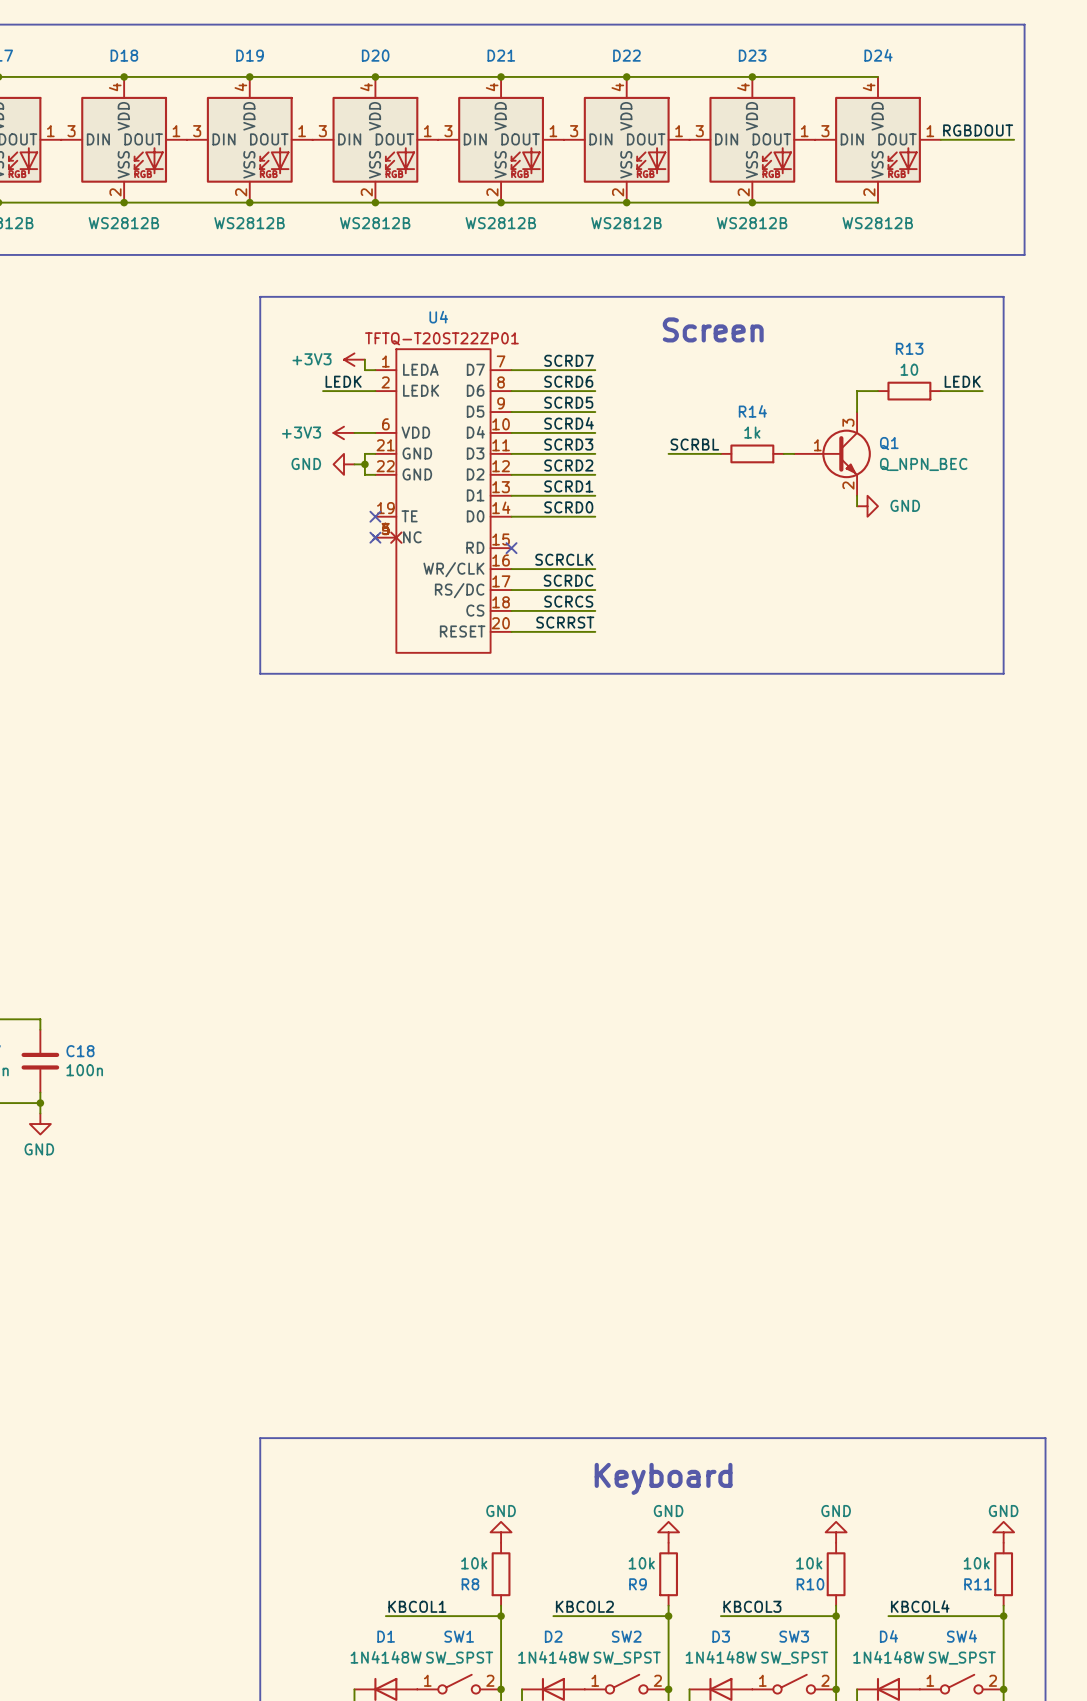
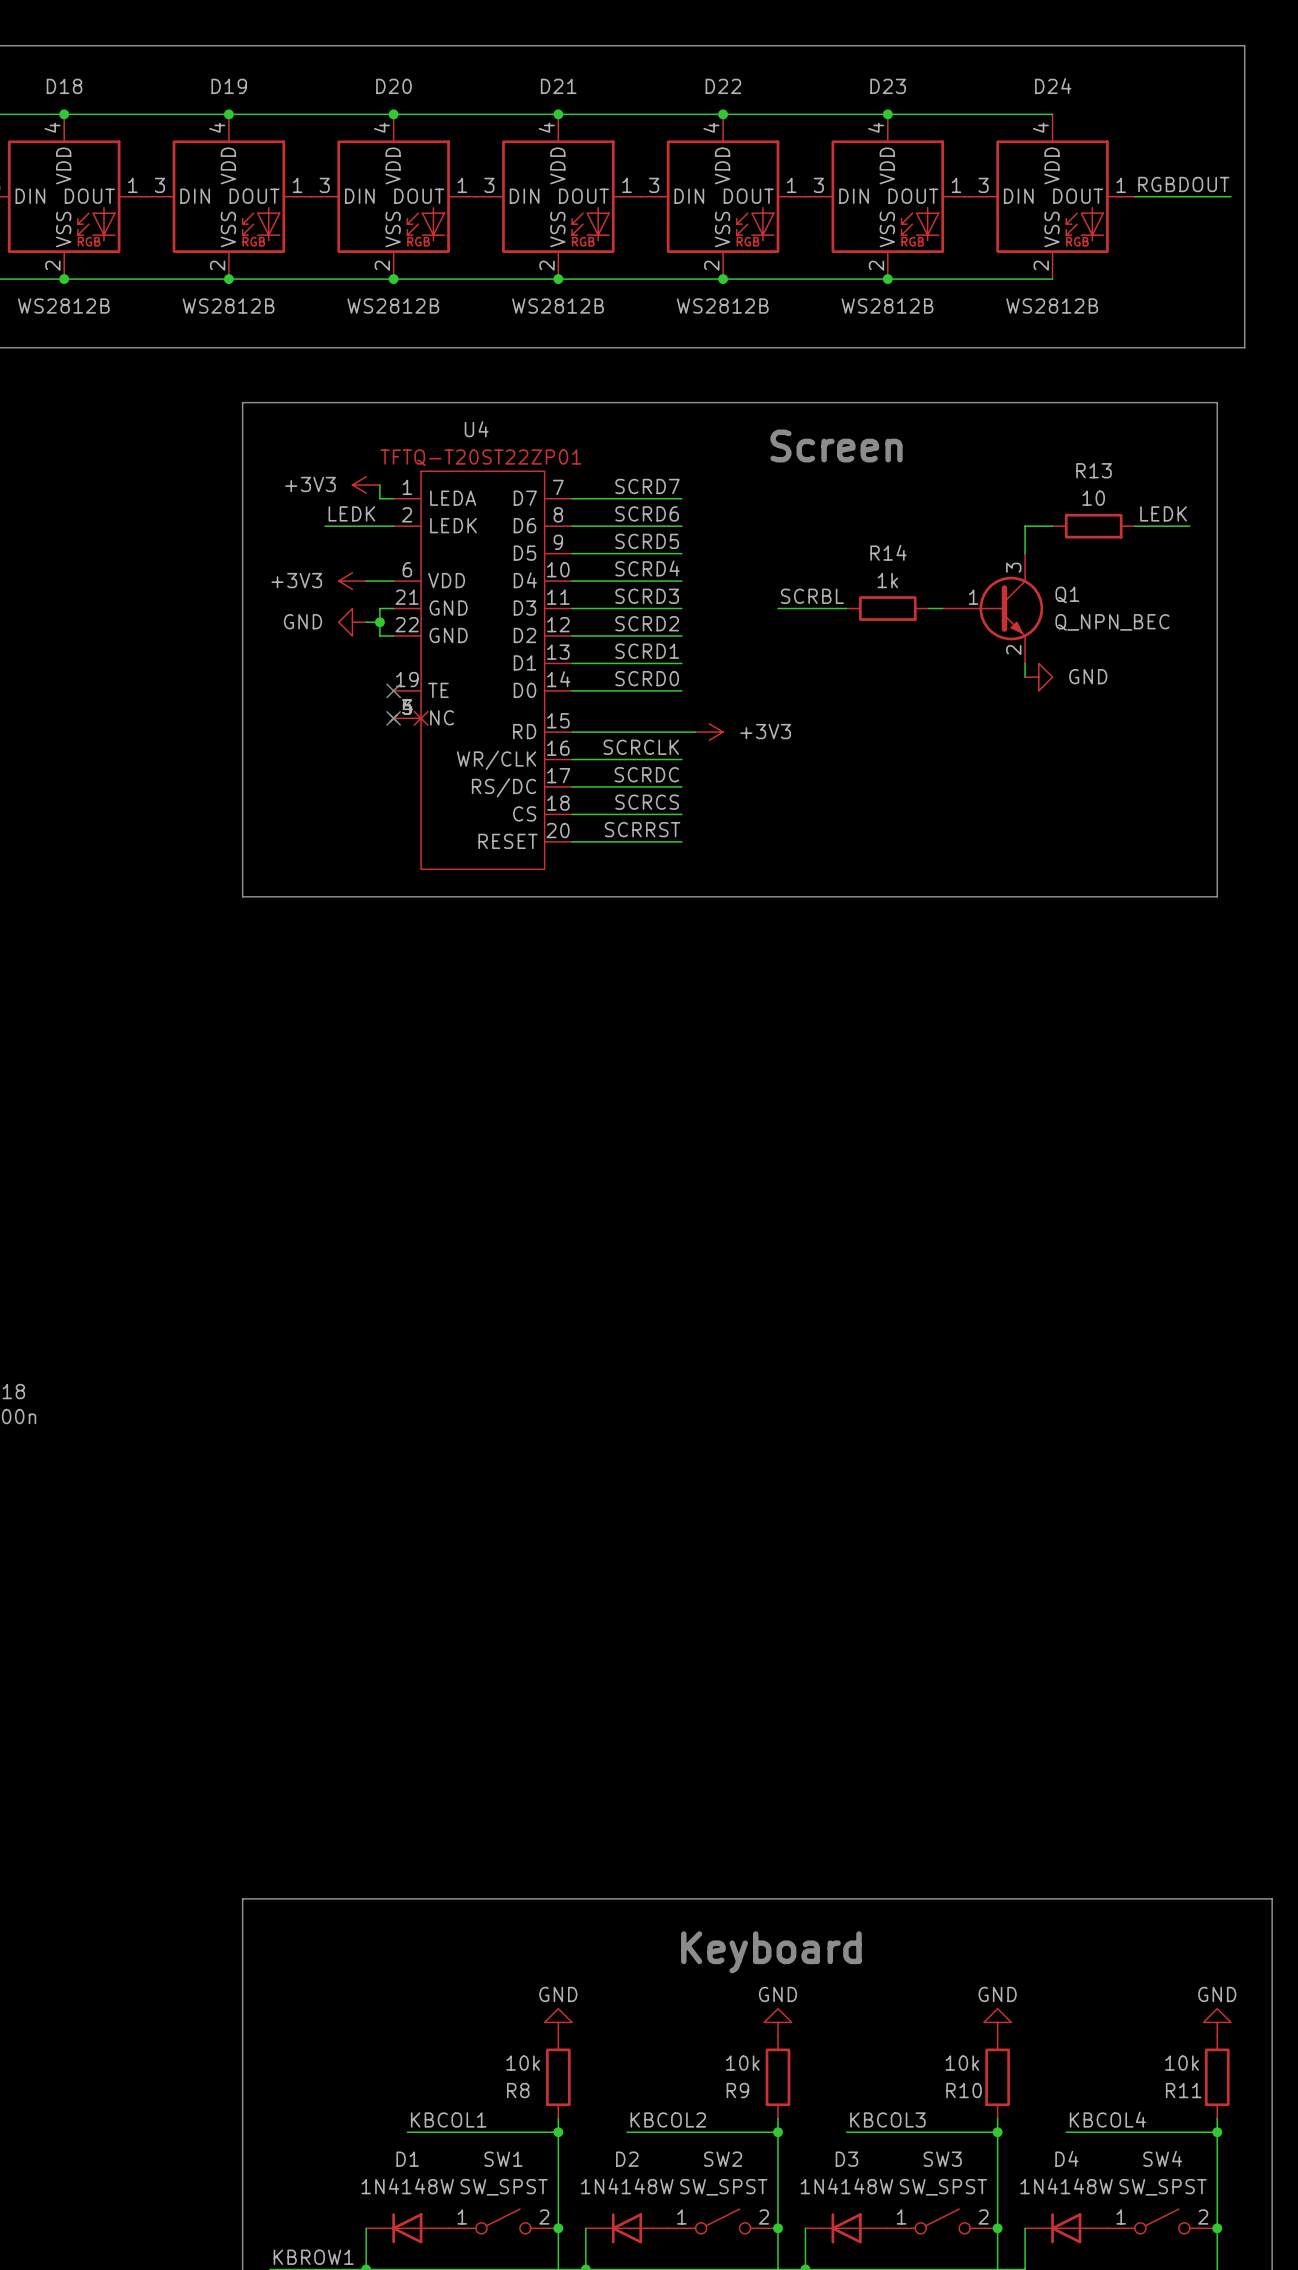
wire: none -> (572, 732) (695, 732)
no-connect mark: (511, 548) -> none
power symbol: none -> +3V3 (709, 732)

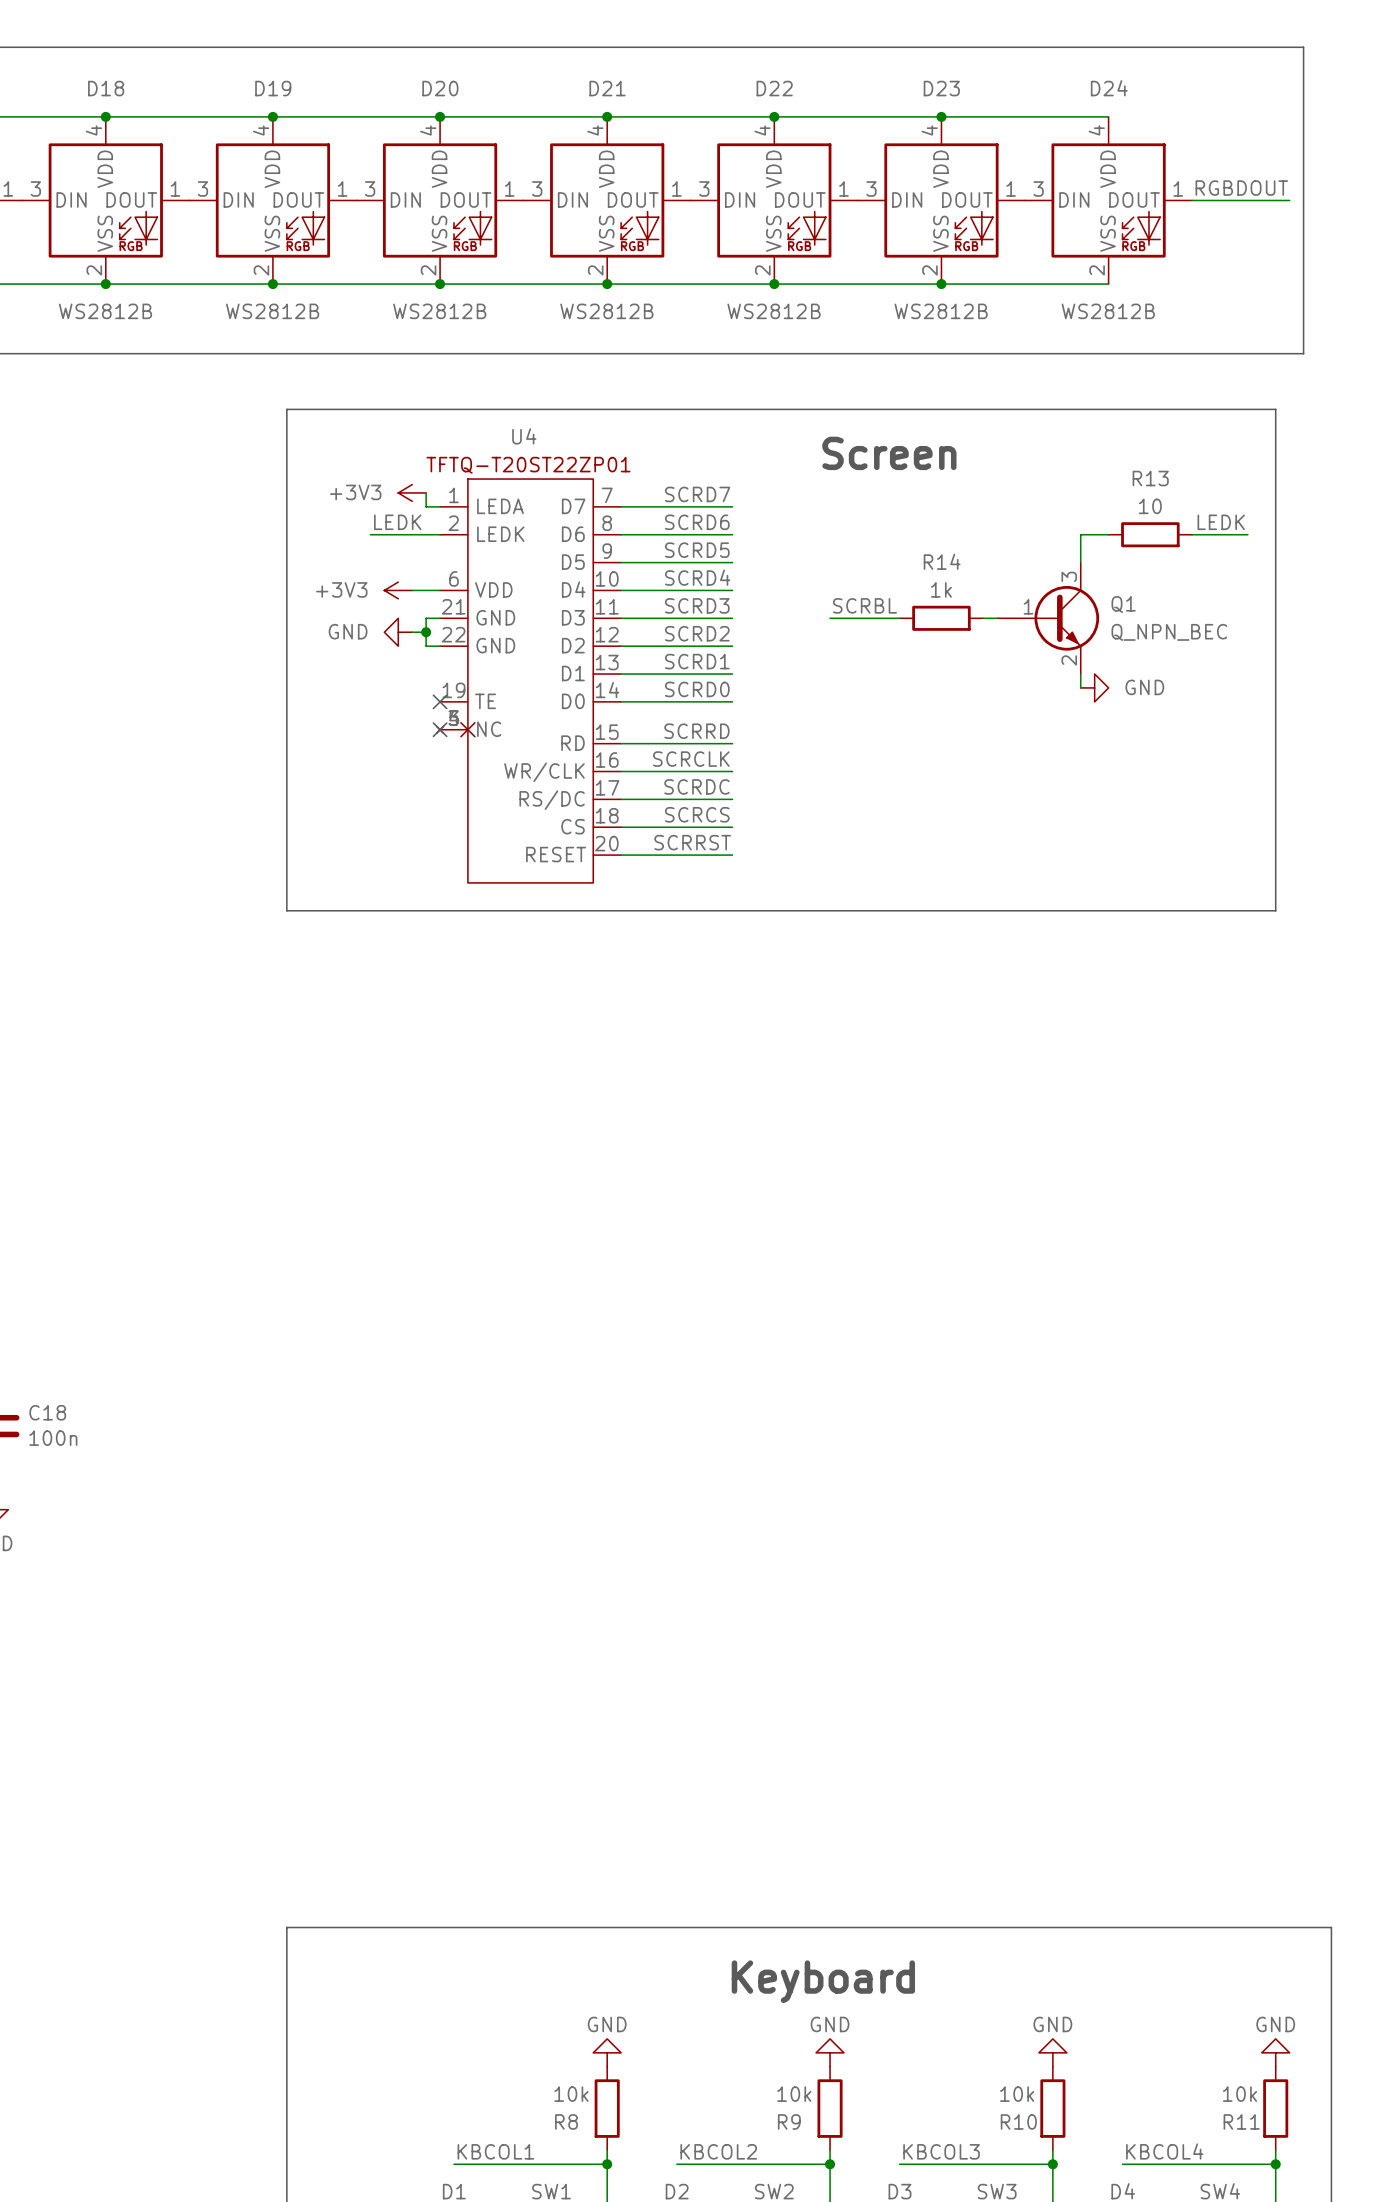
label: none -> SCRRD (696, 731)
wire: (681, 732) (695, 732) -> none
power symbol: +3V3 (709, 732) -> none

